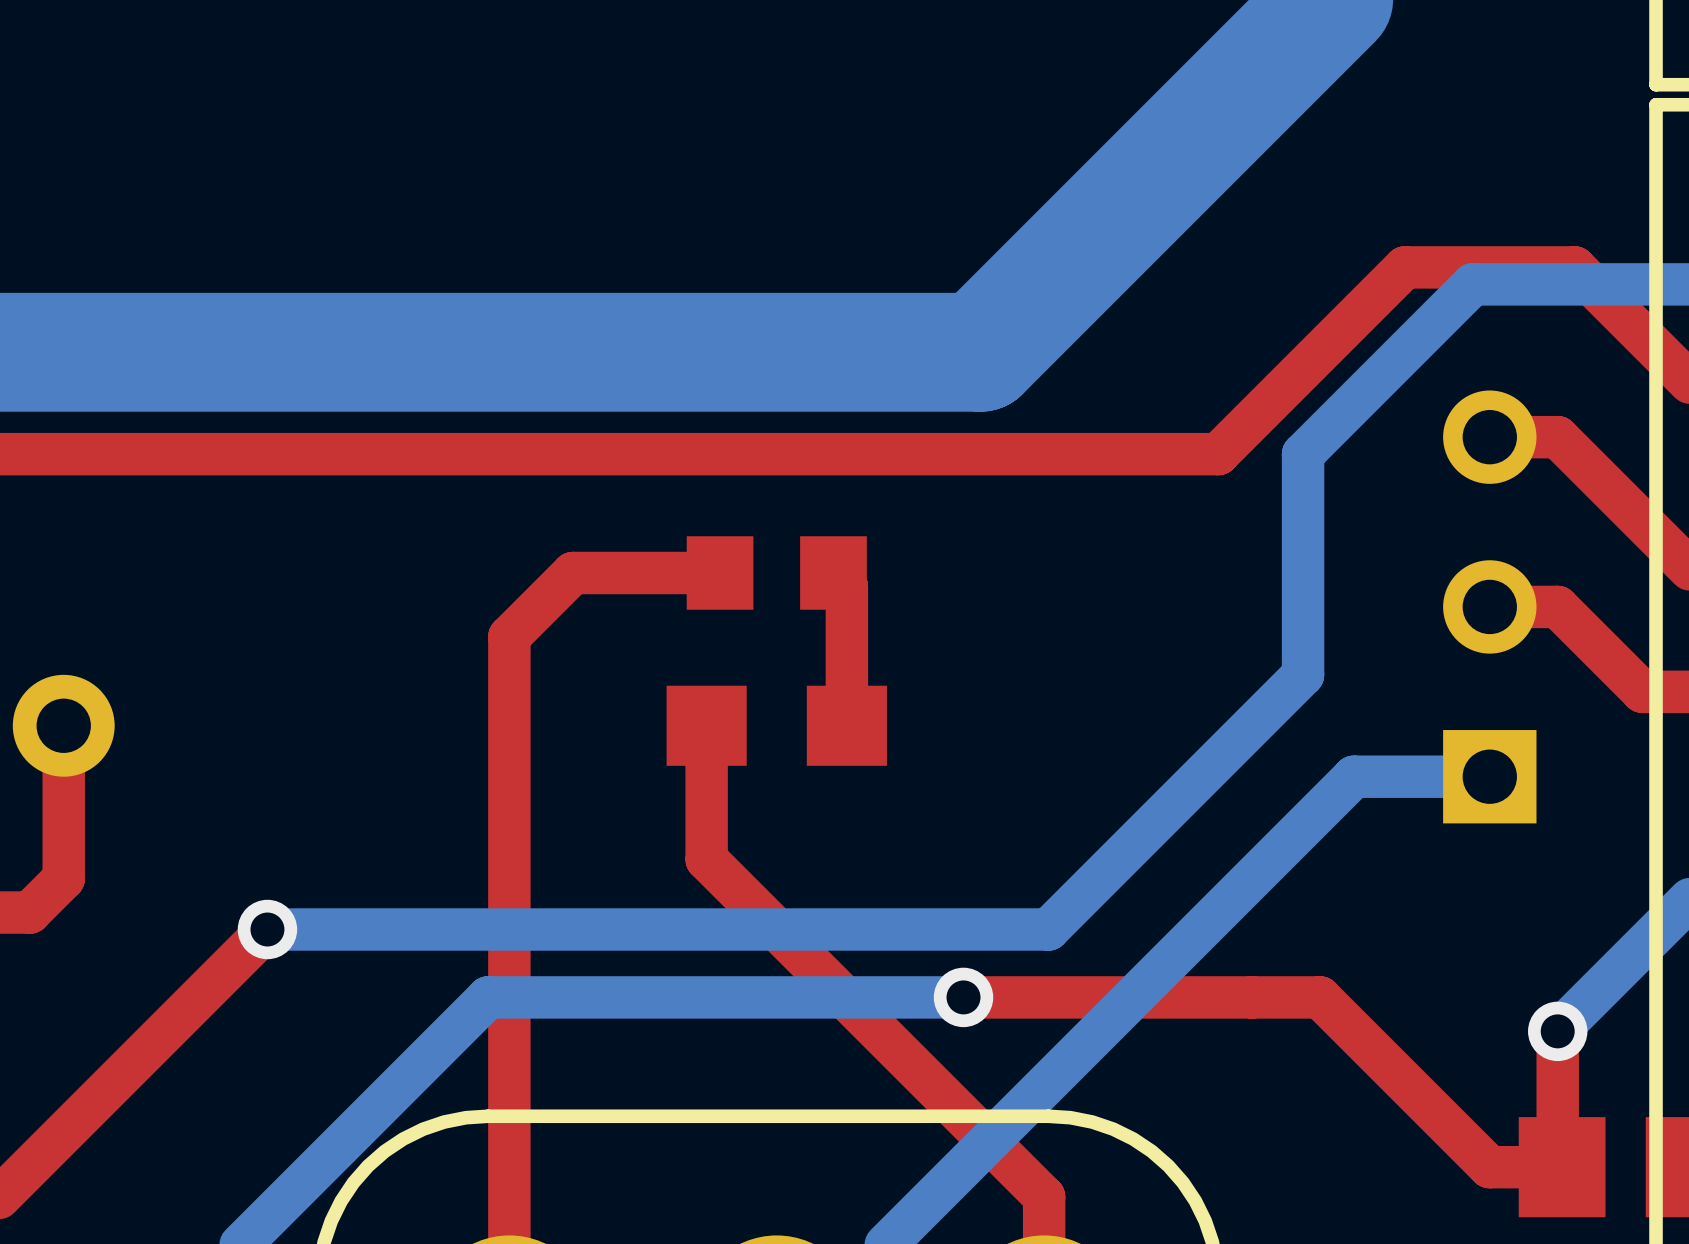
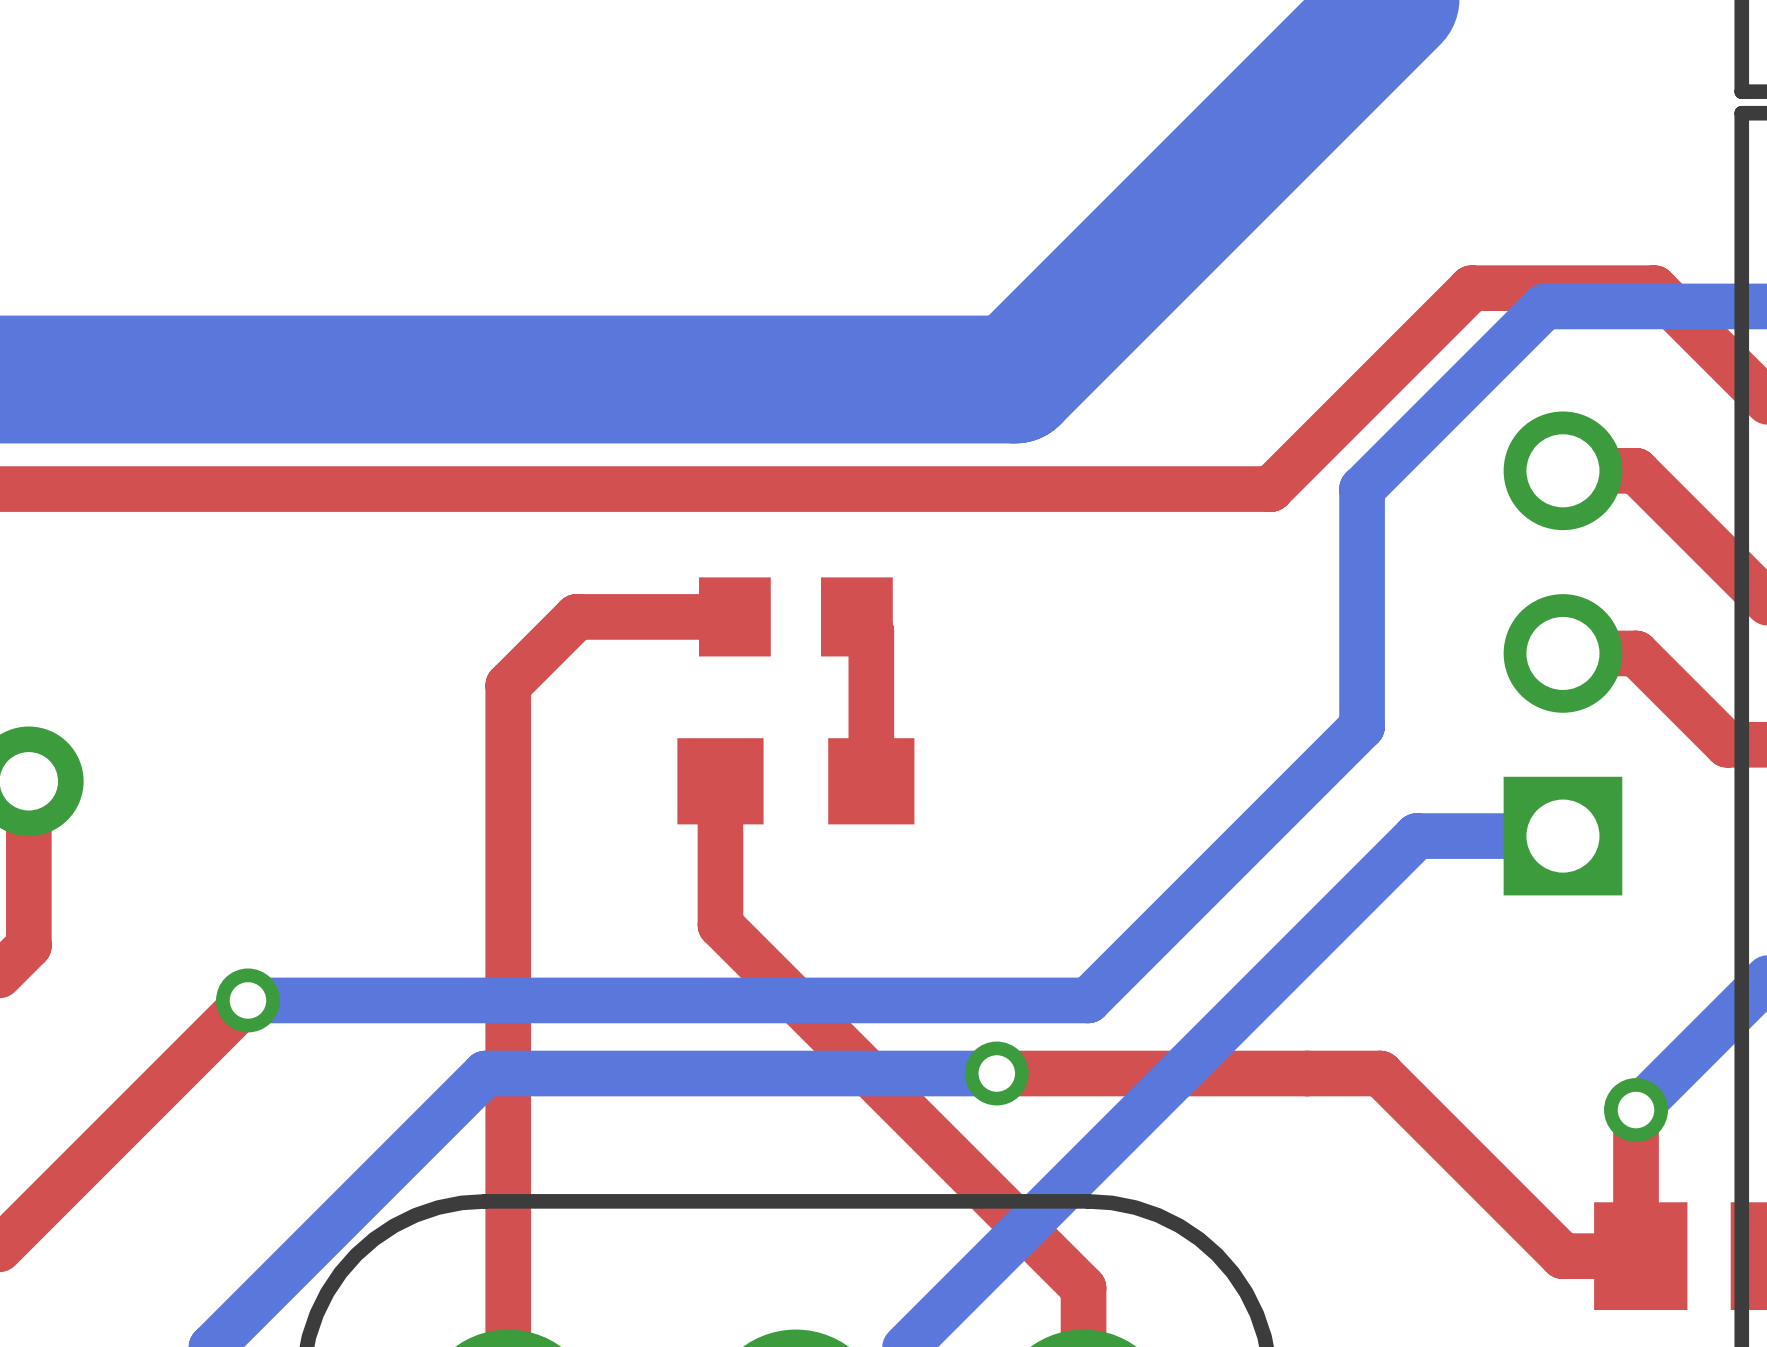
part footprint: [1443, 390, 1537, 824] -> [1503, 411, 1623, 896]

